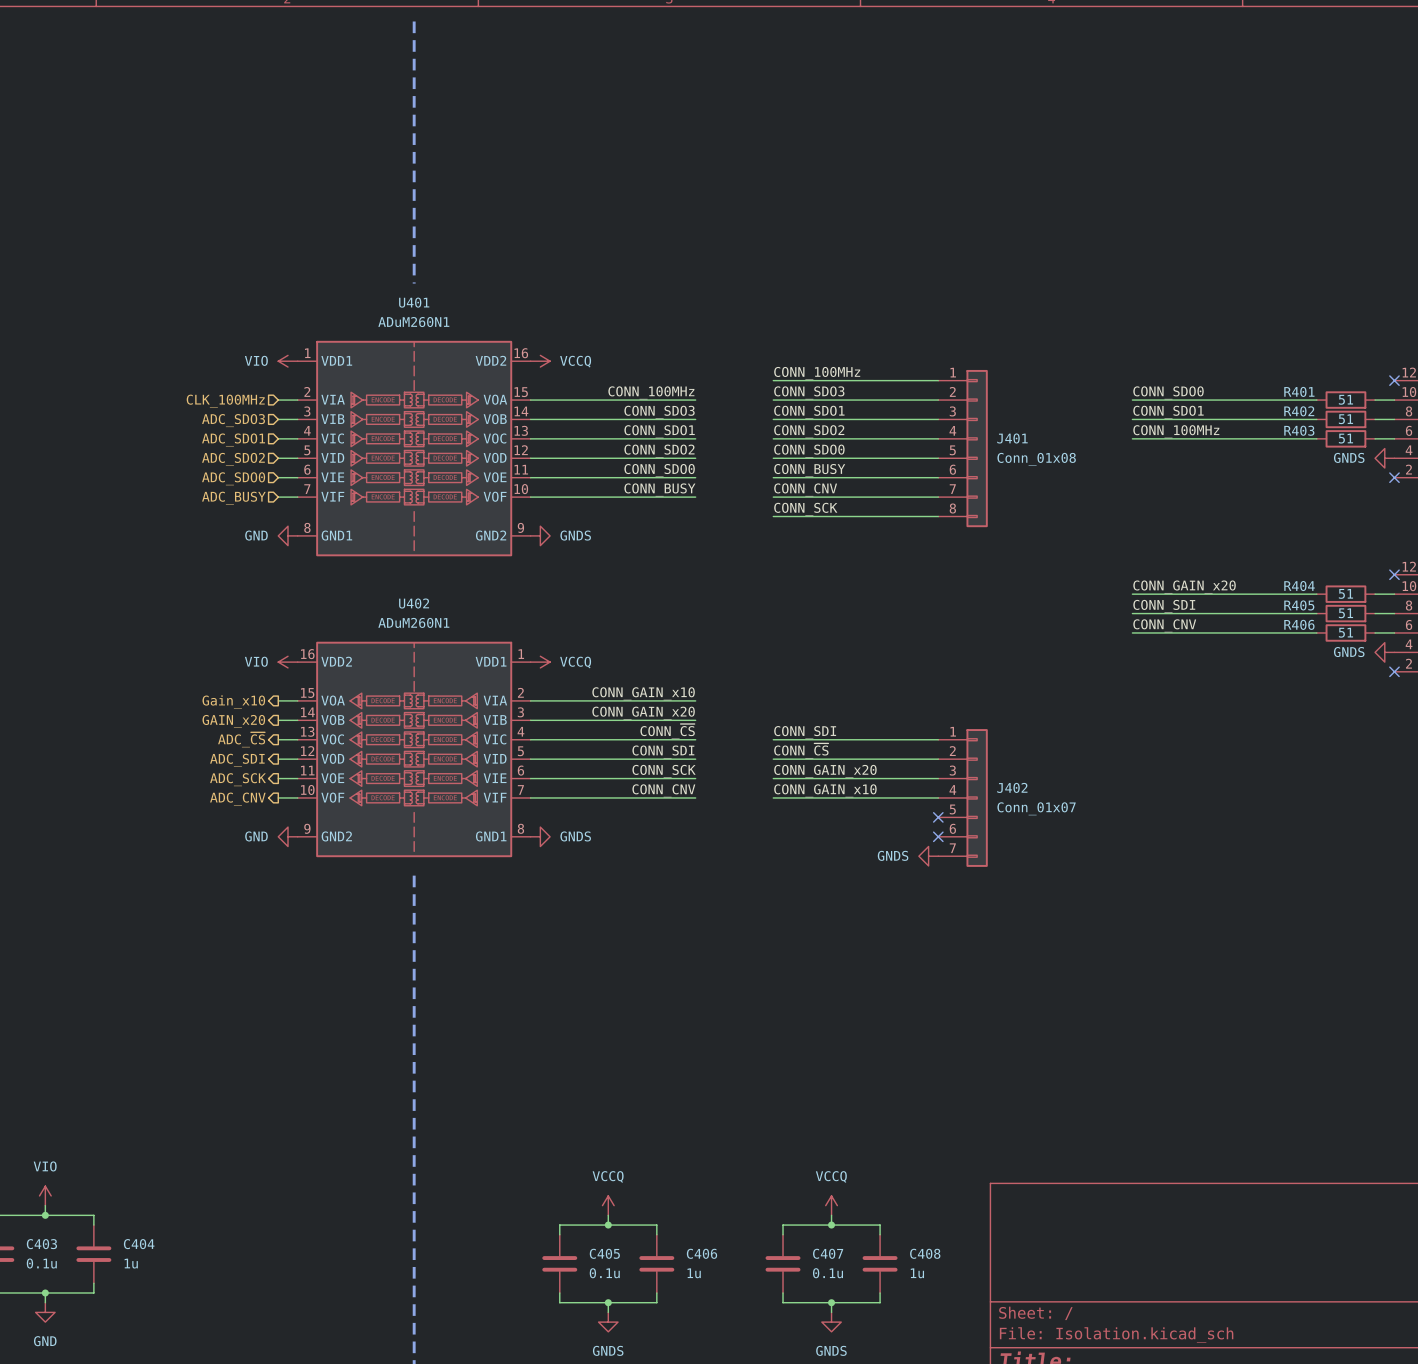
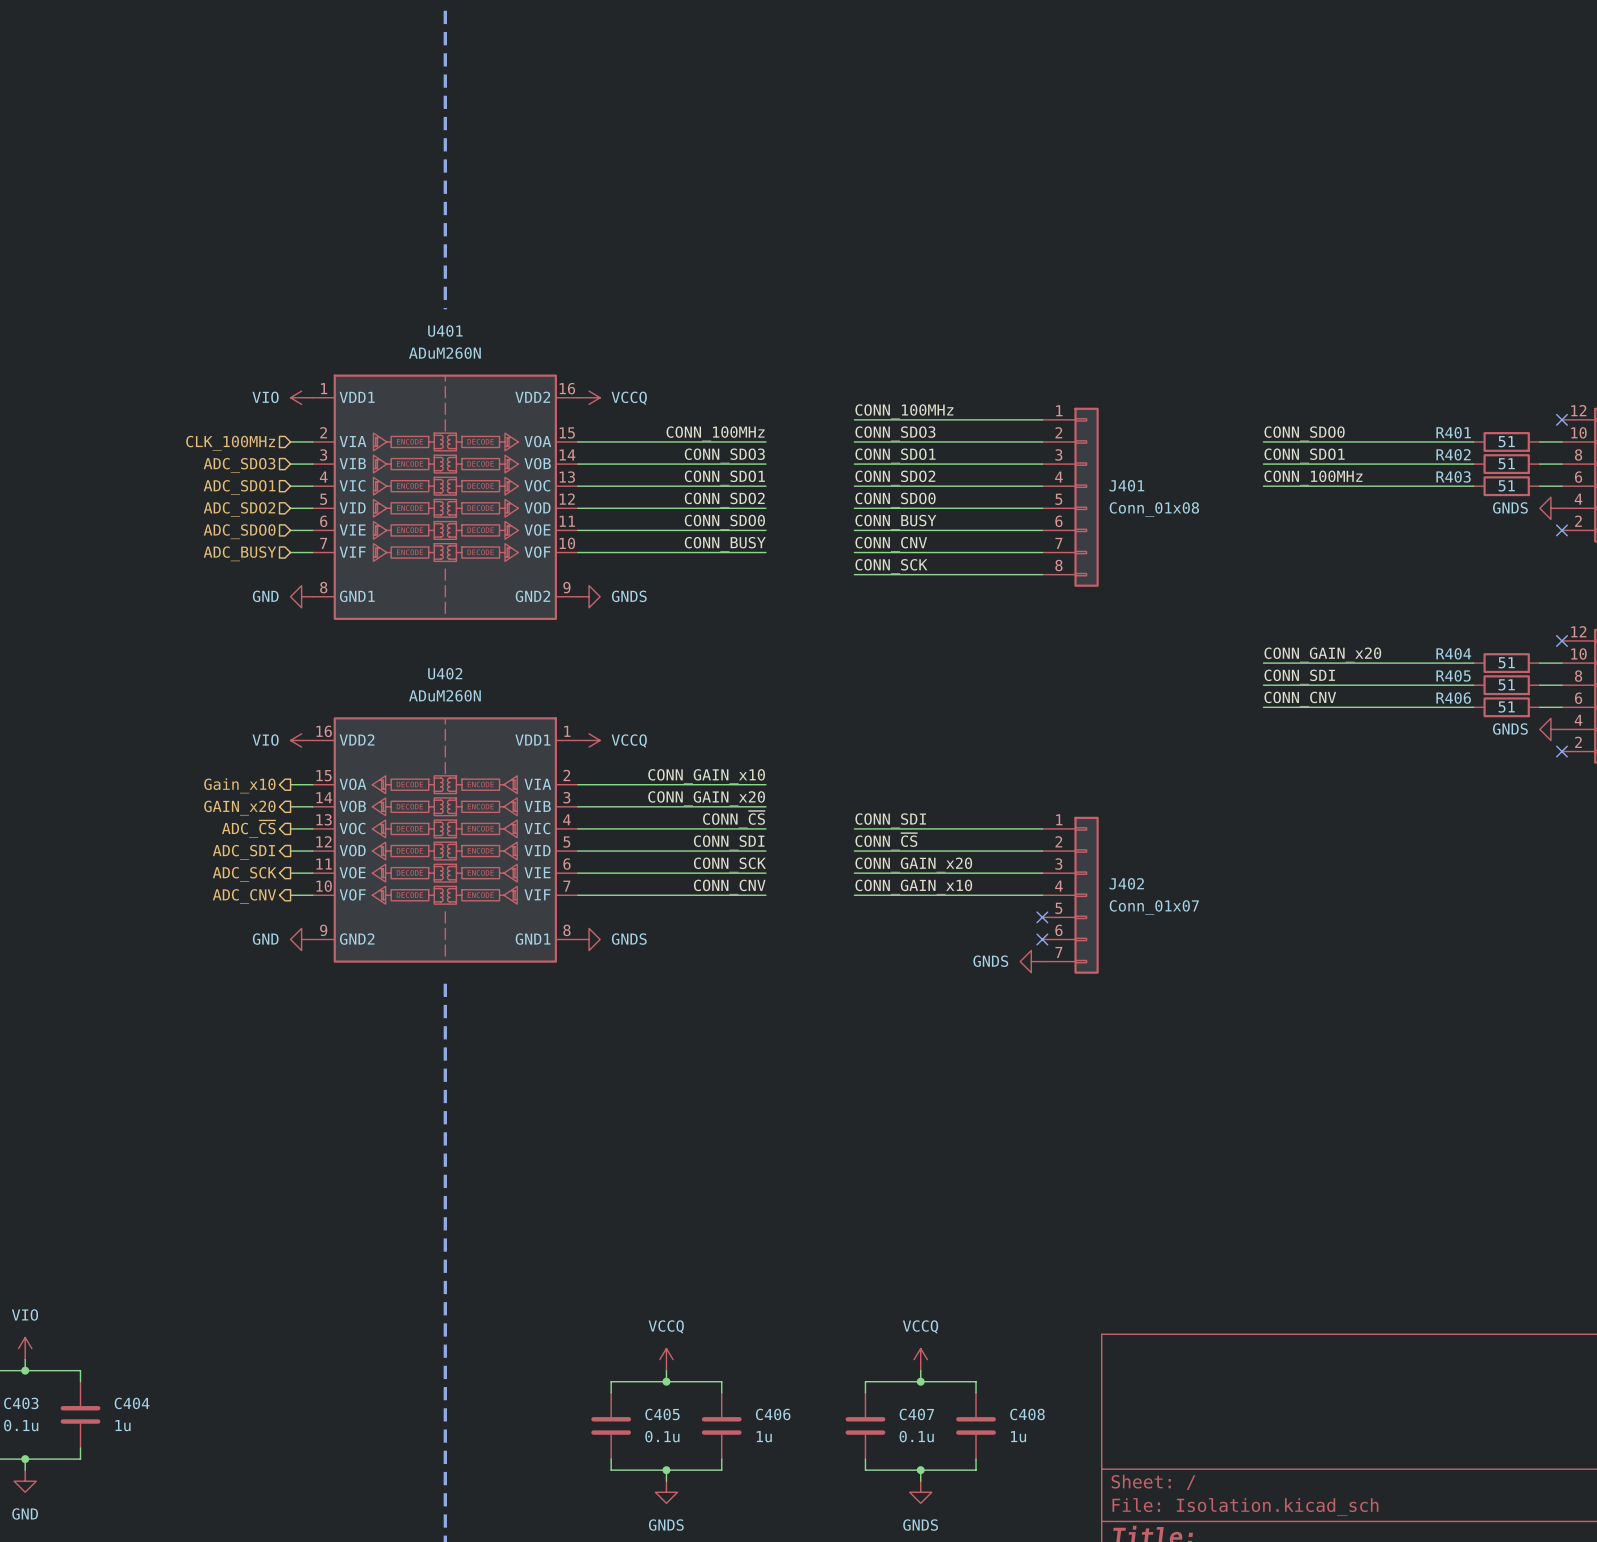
U401 value: ADuM260N1 (413, 322) -> ADuM260N (444, 353)
U402 value: ADuM260N1 (413, 622) -> ADuM260N (444, 695)

